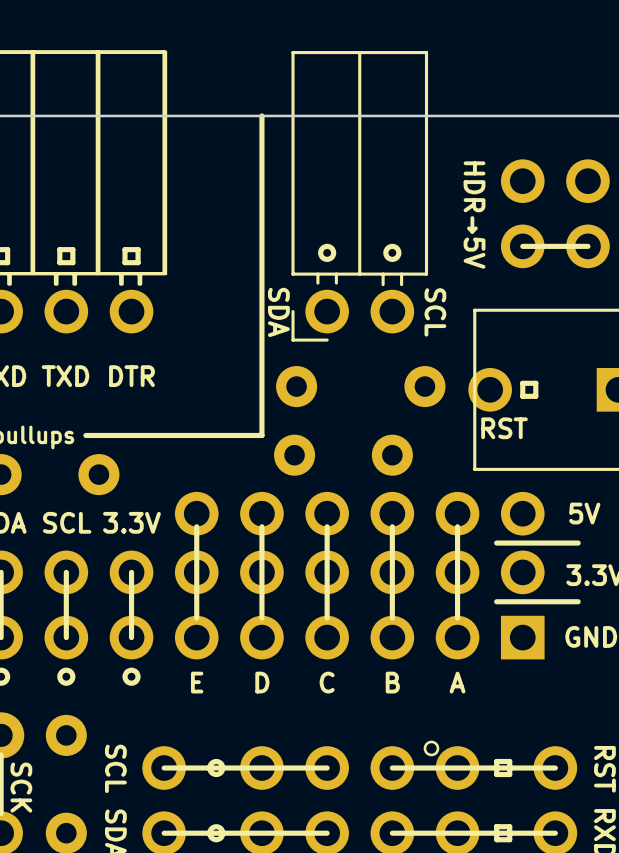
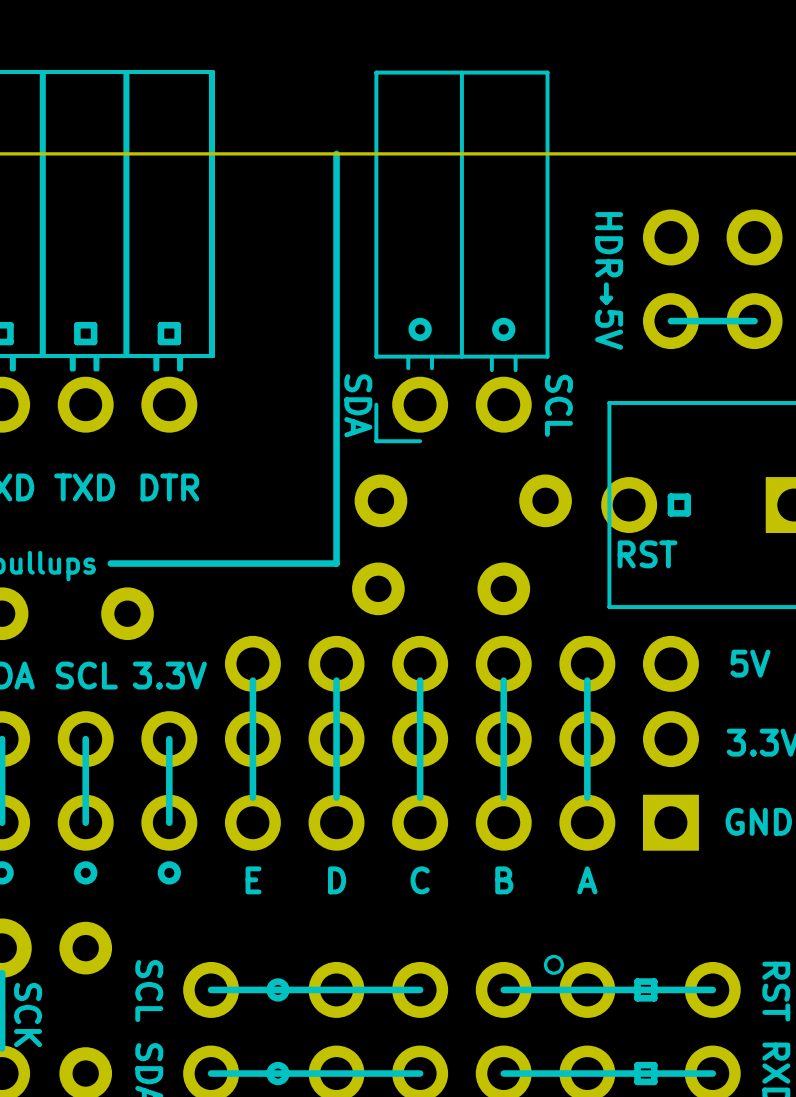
line: (578, 543) (496, 543) -> none
line: (578, 601) (496, 601) -> none

